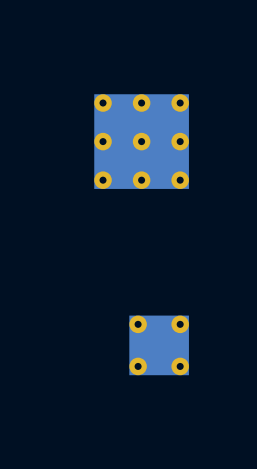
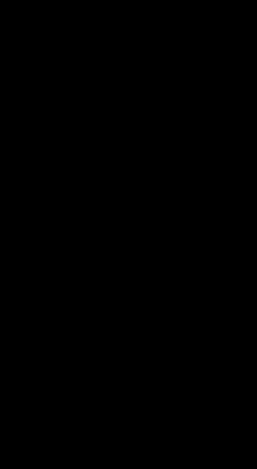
part: (141, 141) -> none
part: (159, 345) -> none

